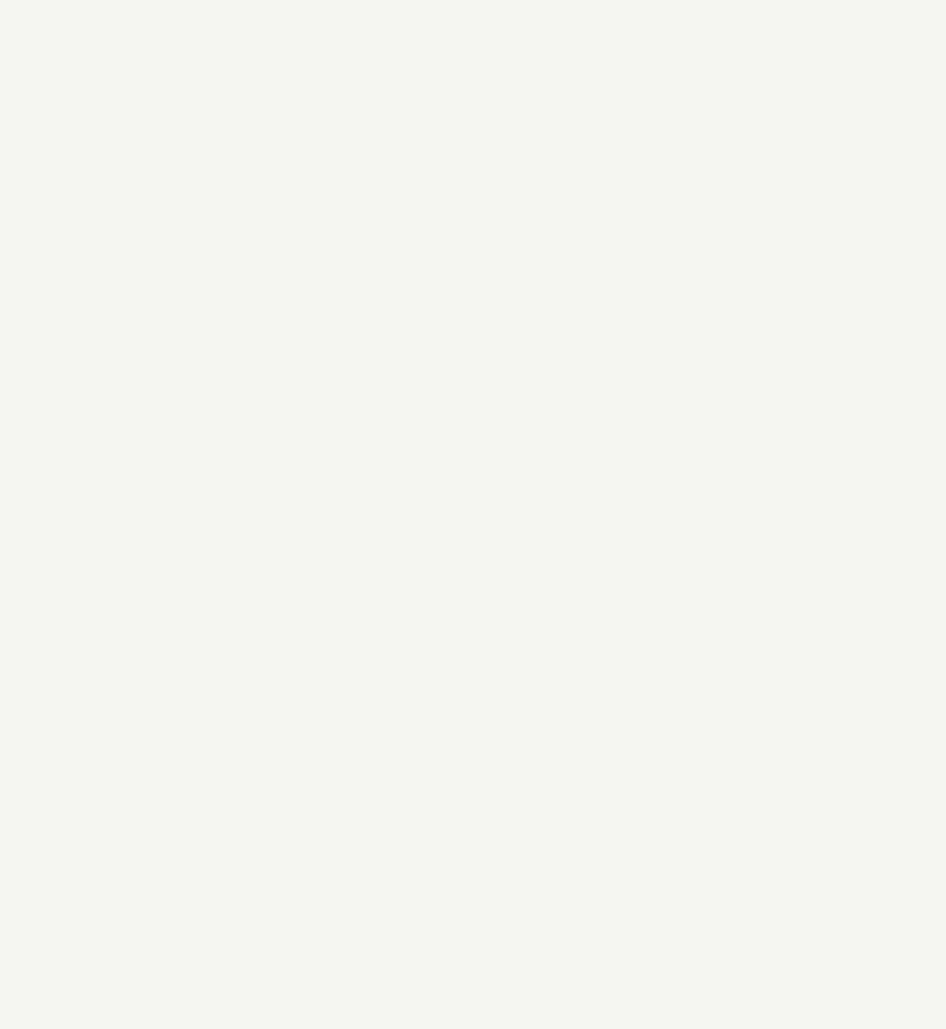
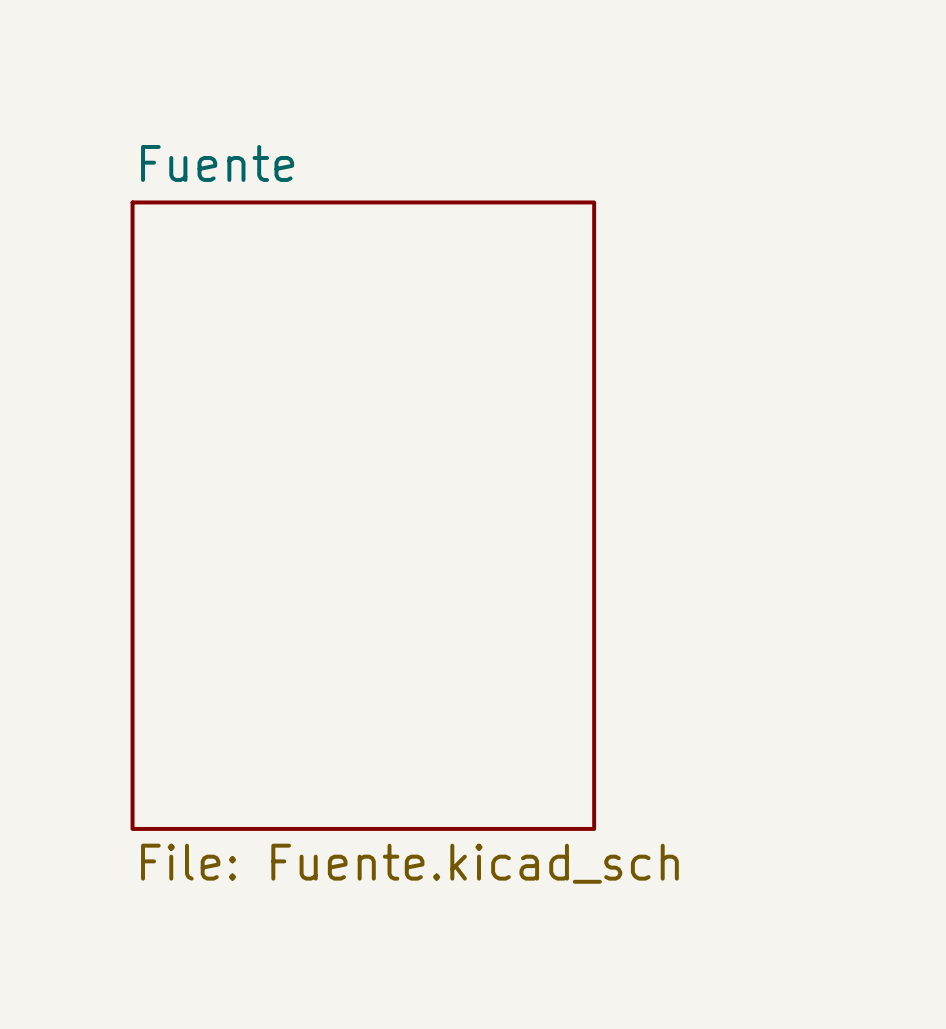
sheet Fuente: none -> File: Fuente.kicad_sch (363, 515)

